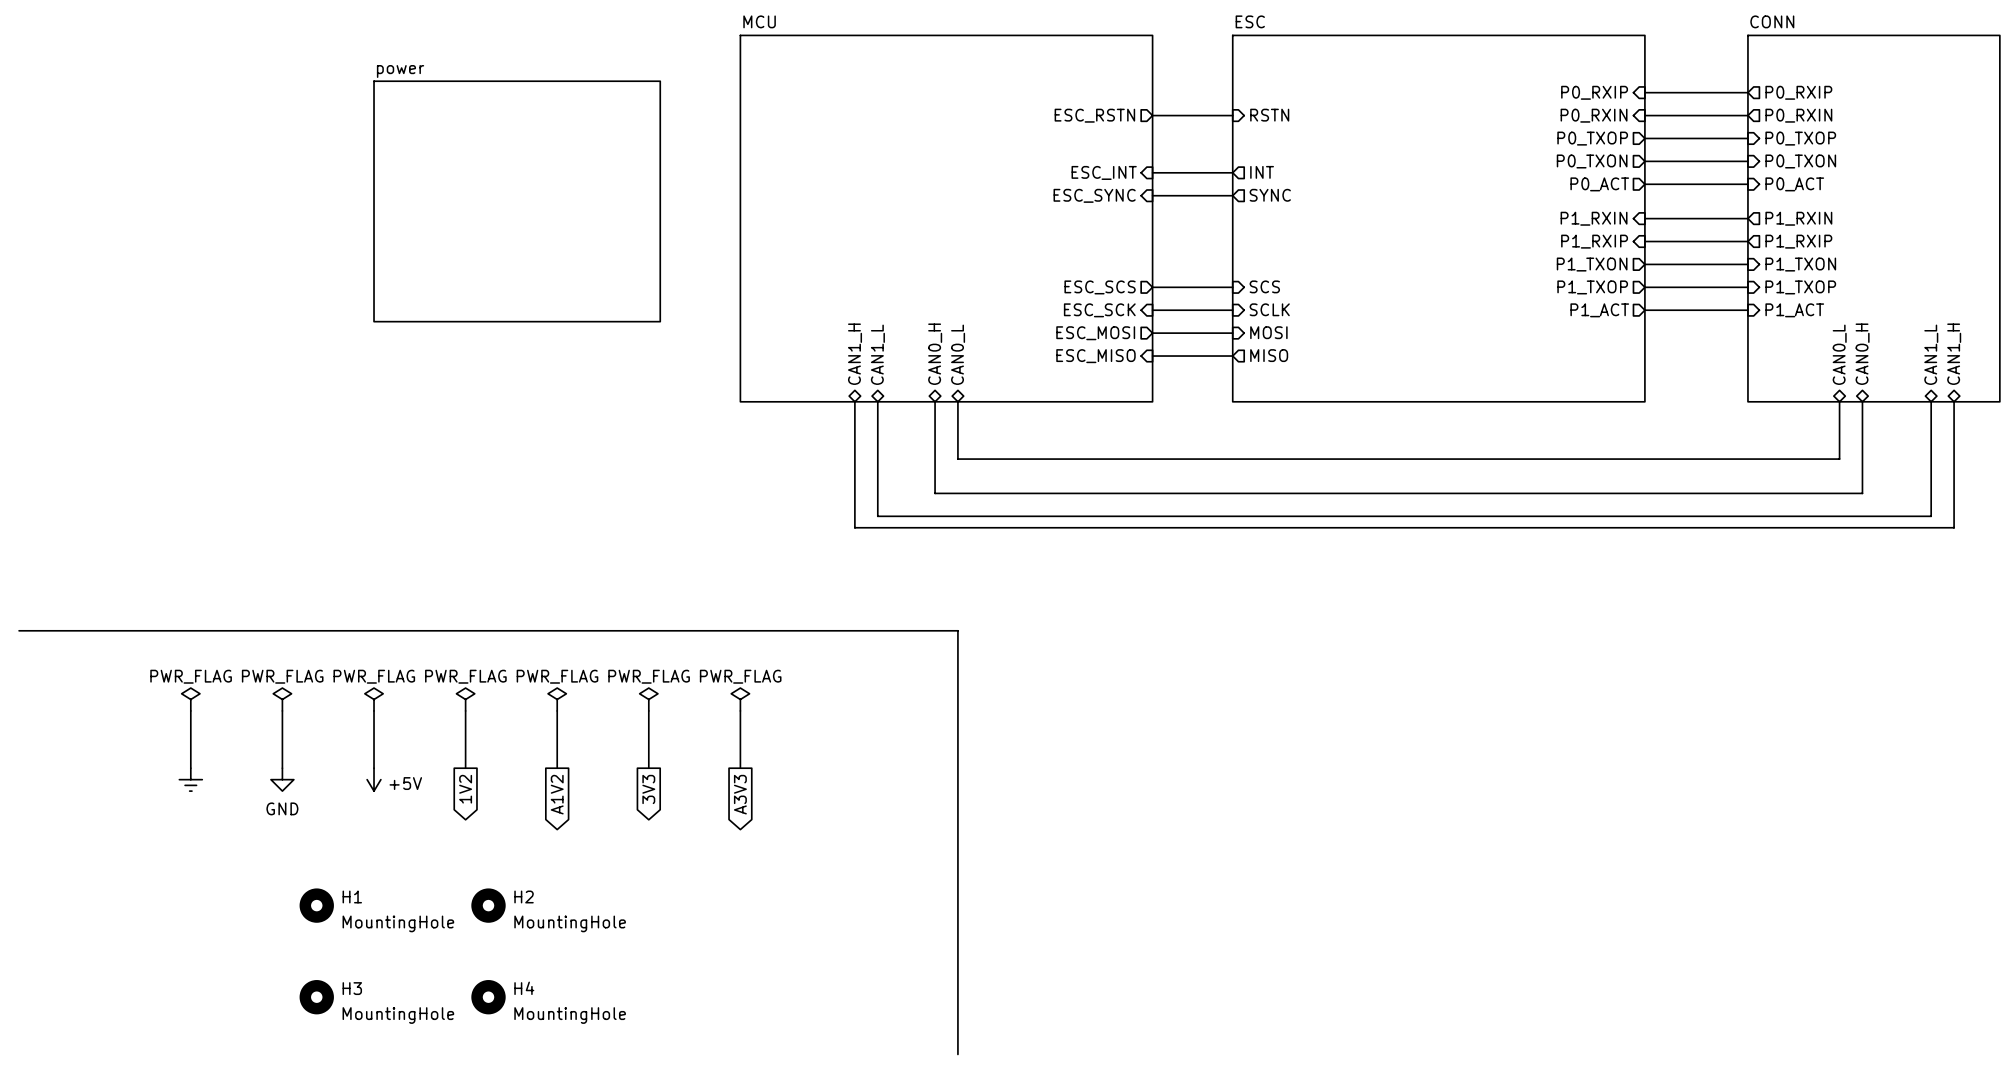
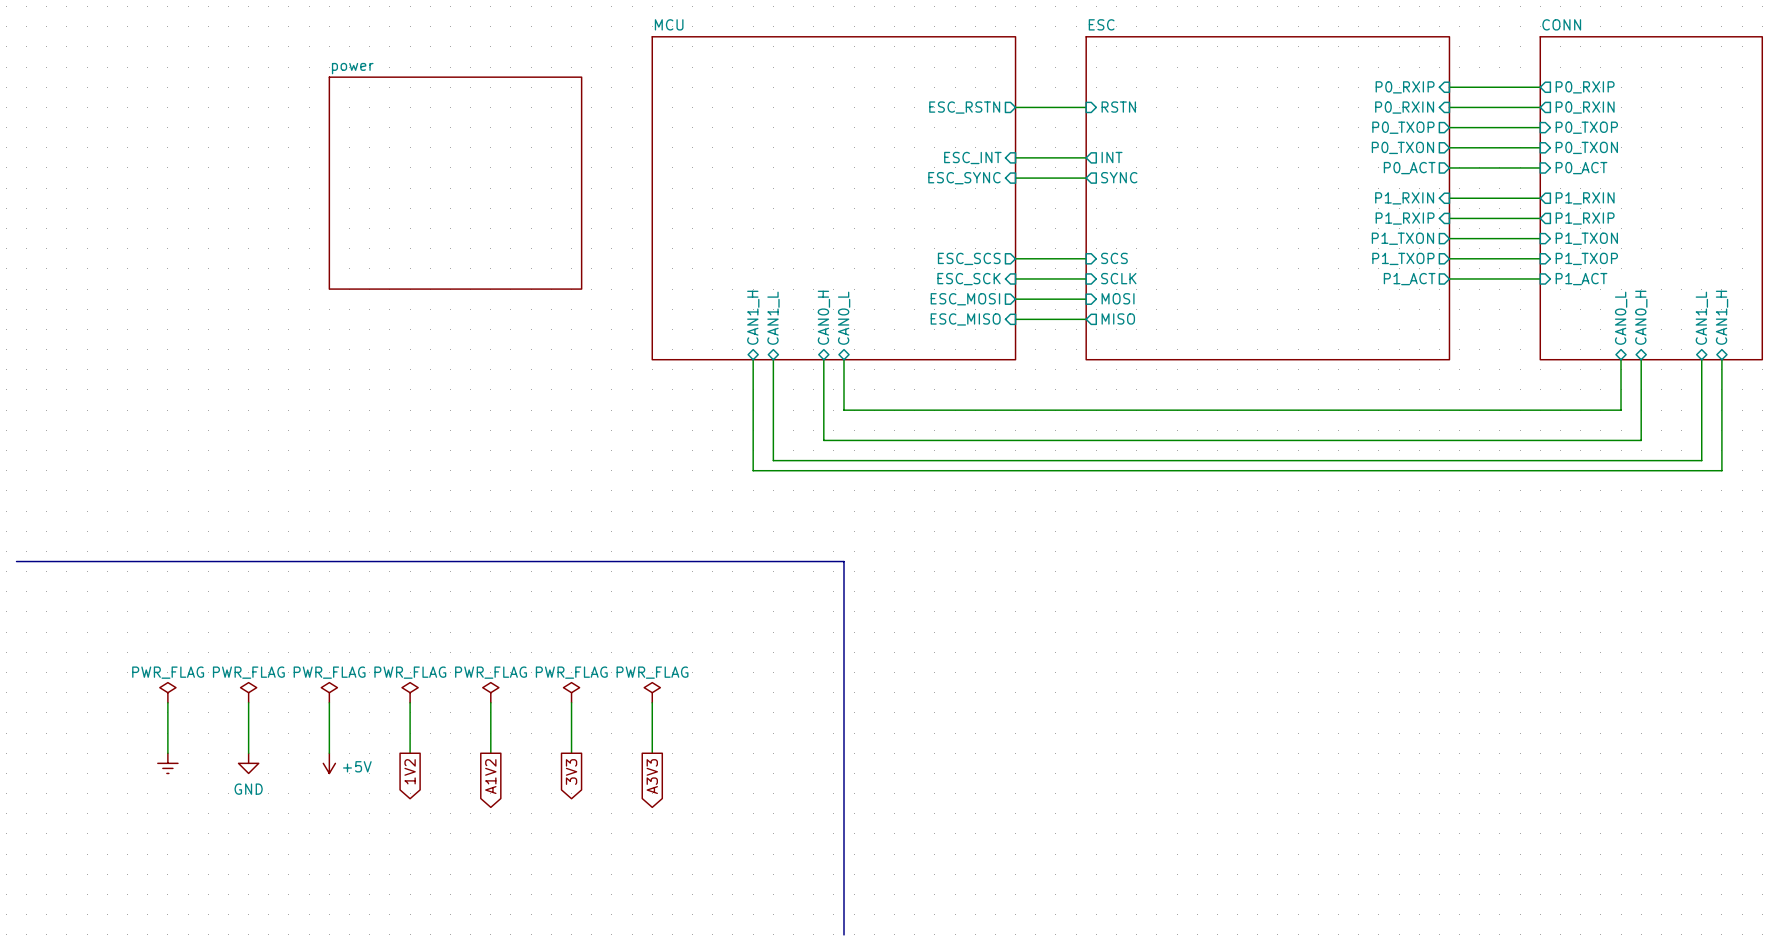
power symbol: PWR_FLAG (190, 699) -> none
power symbol: PWR_FLAG (282, 699) -> none
power symbol: PWR_FLAG (374, 699) -> none
power symbol: PWR_FLAG (465, 699) -> none
power symbol: PWR_FLAG (557, 699) -> none
power symbol: PWR_FLAG (648, 699) -> none
power symbol: PWR_FLAG (740, 699) -> none
wire: (190, 710) (190, 768) -> (167, 702) (167, 753)
wire: (282, 710) (282, 768) -> (248, 702) (248, 753)
wire: (374, 710) (374, 768) -> (329, 702) (329, 753)
wire: (465, 710) (465, 768) -> (410, 702) (410, 753)
wire: (557, 710) (557, 768) -> (490, 702) (490, 753)
wire: (648, 710) (648, 768) -> (571, 702) (571, 753)
wire: (740, 710) (740, 768) -> (652, 702) (652, 753)
power symbol text: none -> PWR_FLAG (168, 672)
power symbol shape: [179, 768, 203, 792] -> [159, 682, 176, 703]
power symbol: GND (282, 779) -> PWR_FLAG (248, 692)
power symbol: +5V (374, 779) -> PWR_FLAG (329, 692)
power symbol: none -> PWR_FLAG (410, 692)
power symbol: none -> PWR_FLAG (490, 692)
power symbol: none -> PWR_FLAG (571, 692)
power symbol: none -> PWR_FLAG (652, 692)
global label position: 1V2 (465, 789) -> 1V2 (410, 771)
global label position: 3V3 (648, 789) -> 3V3 (571, 772)
global label position: A1V2 (557, 794) -> A1V2 (490, 776)
global label position: A3V3 (740, 794) -> A3V3 (652, 776)
power symbol: none -> (167, 763)
power symbol: none -> GND (248, 763)
power symbol: none -> +5V (329, 763)
H1: MountingHole (316, 905) -> none
H2: MountingHole (488, 905) -> none
H3: MountingHole (316, 997) -> none
H4: MountingHole (488, 997) -> none

